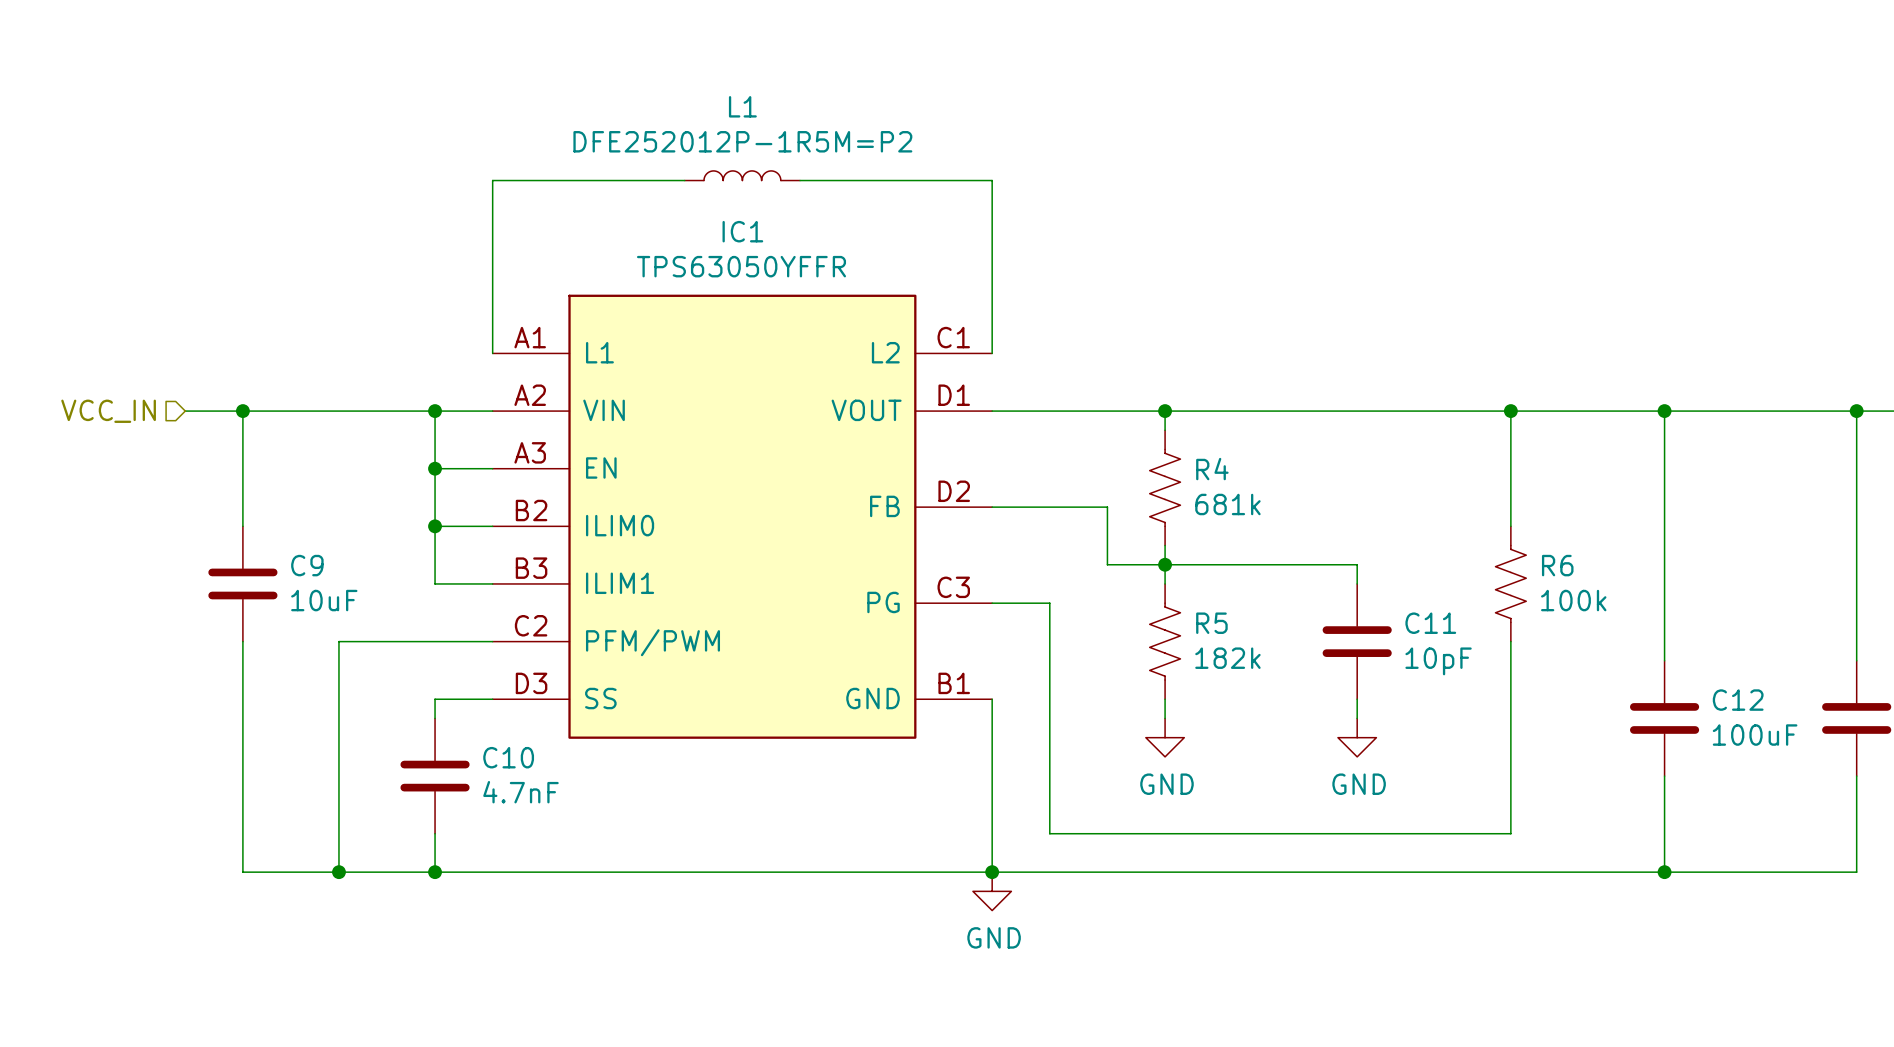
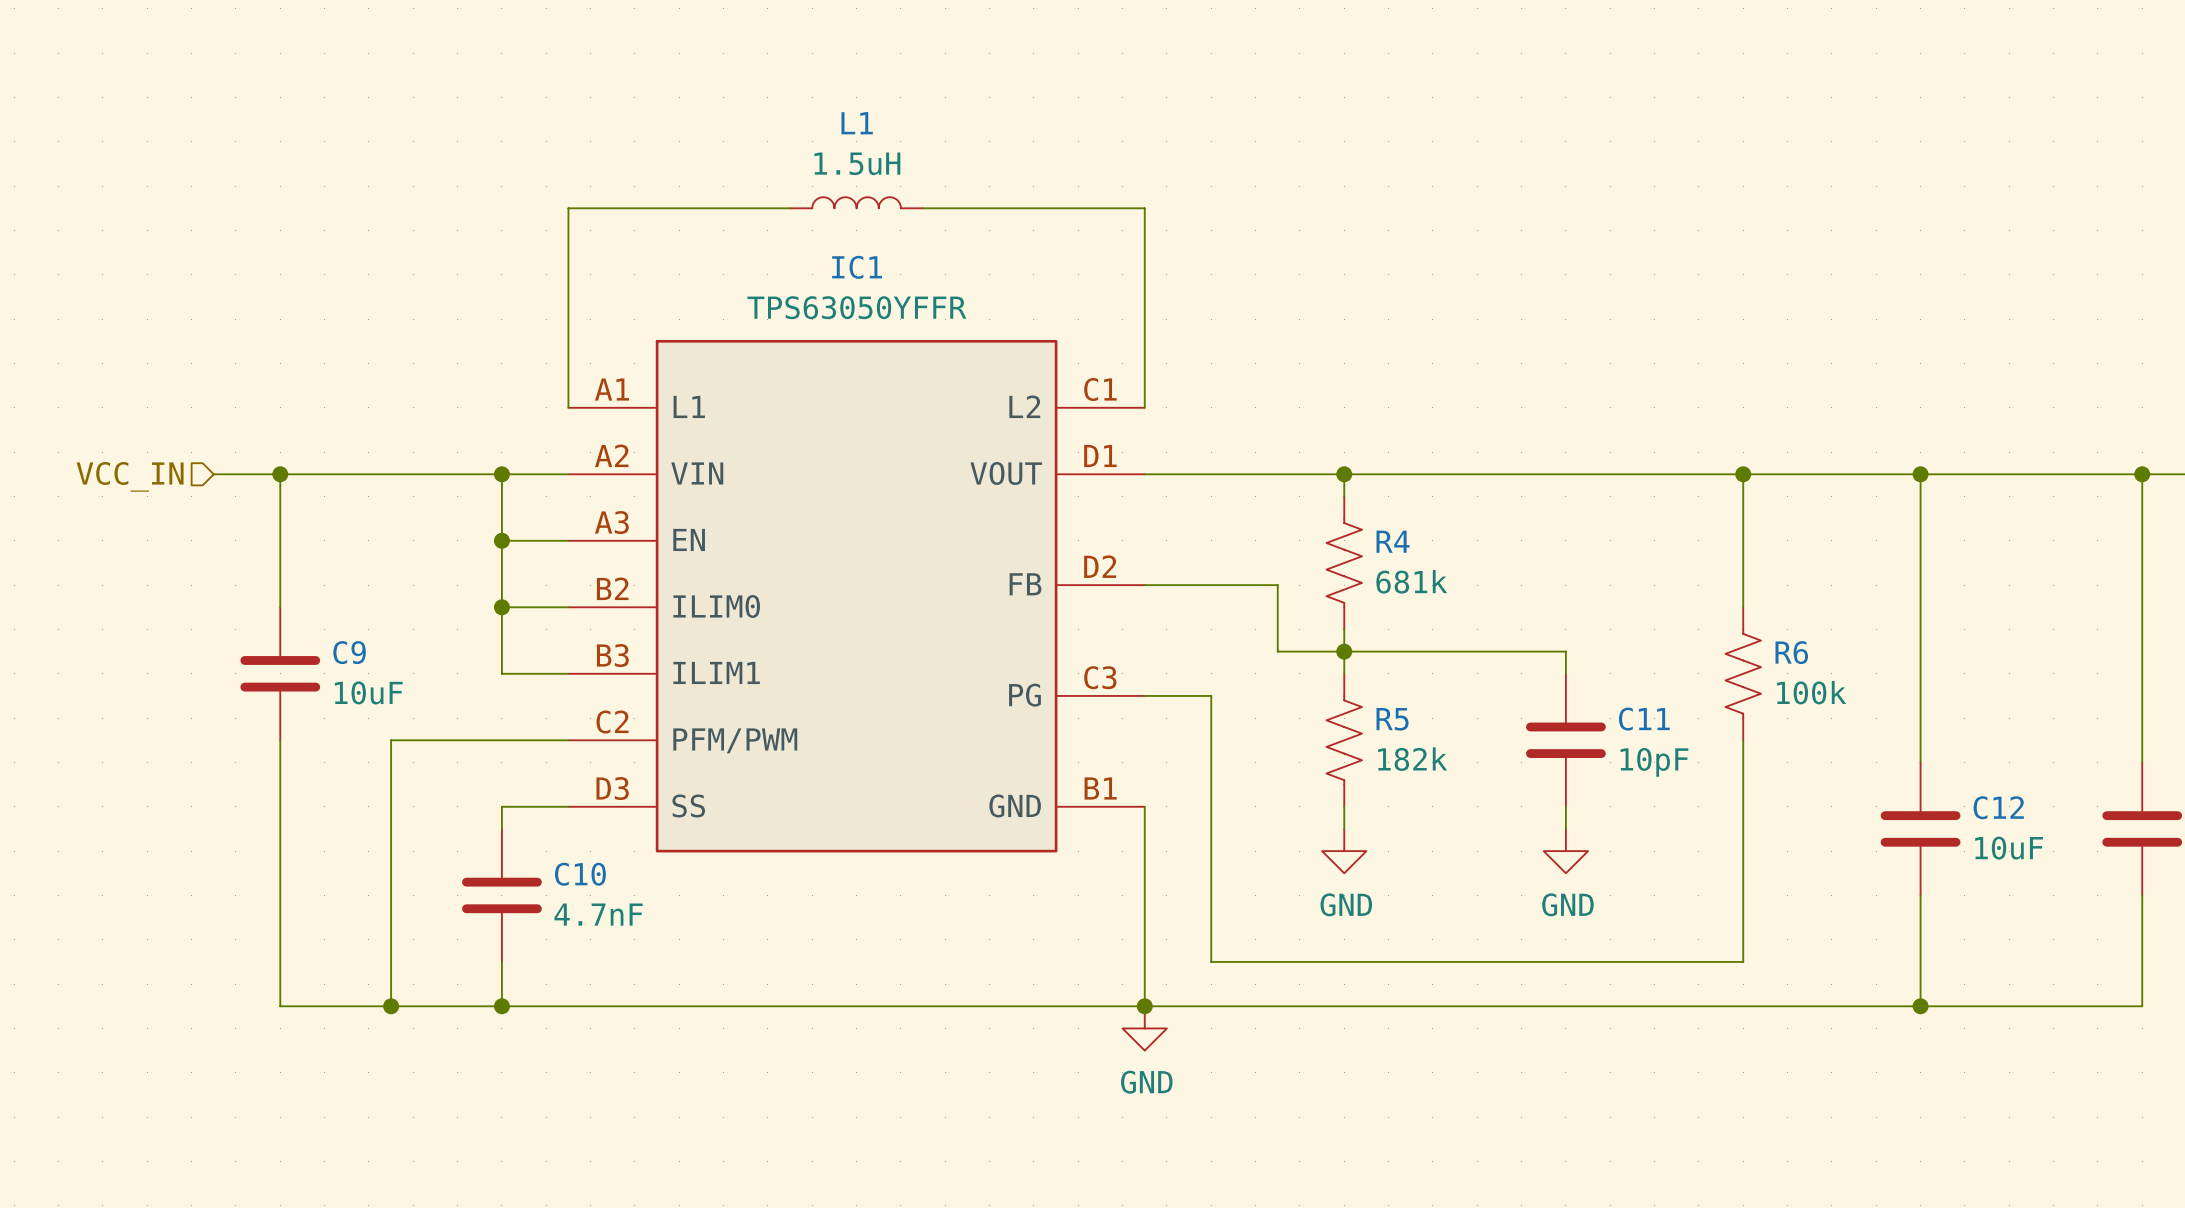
L1 value: DFE252012P-1R5M=P2 (742, 141) -> 1.5uH (857, 163)
C12 value: 100uF (1755, 735) -> 10uF (2009, 848)

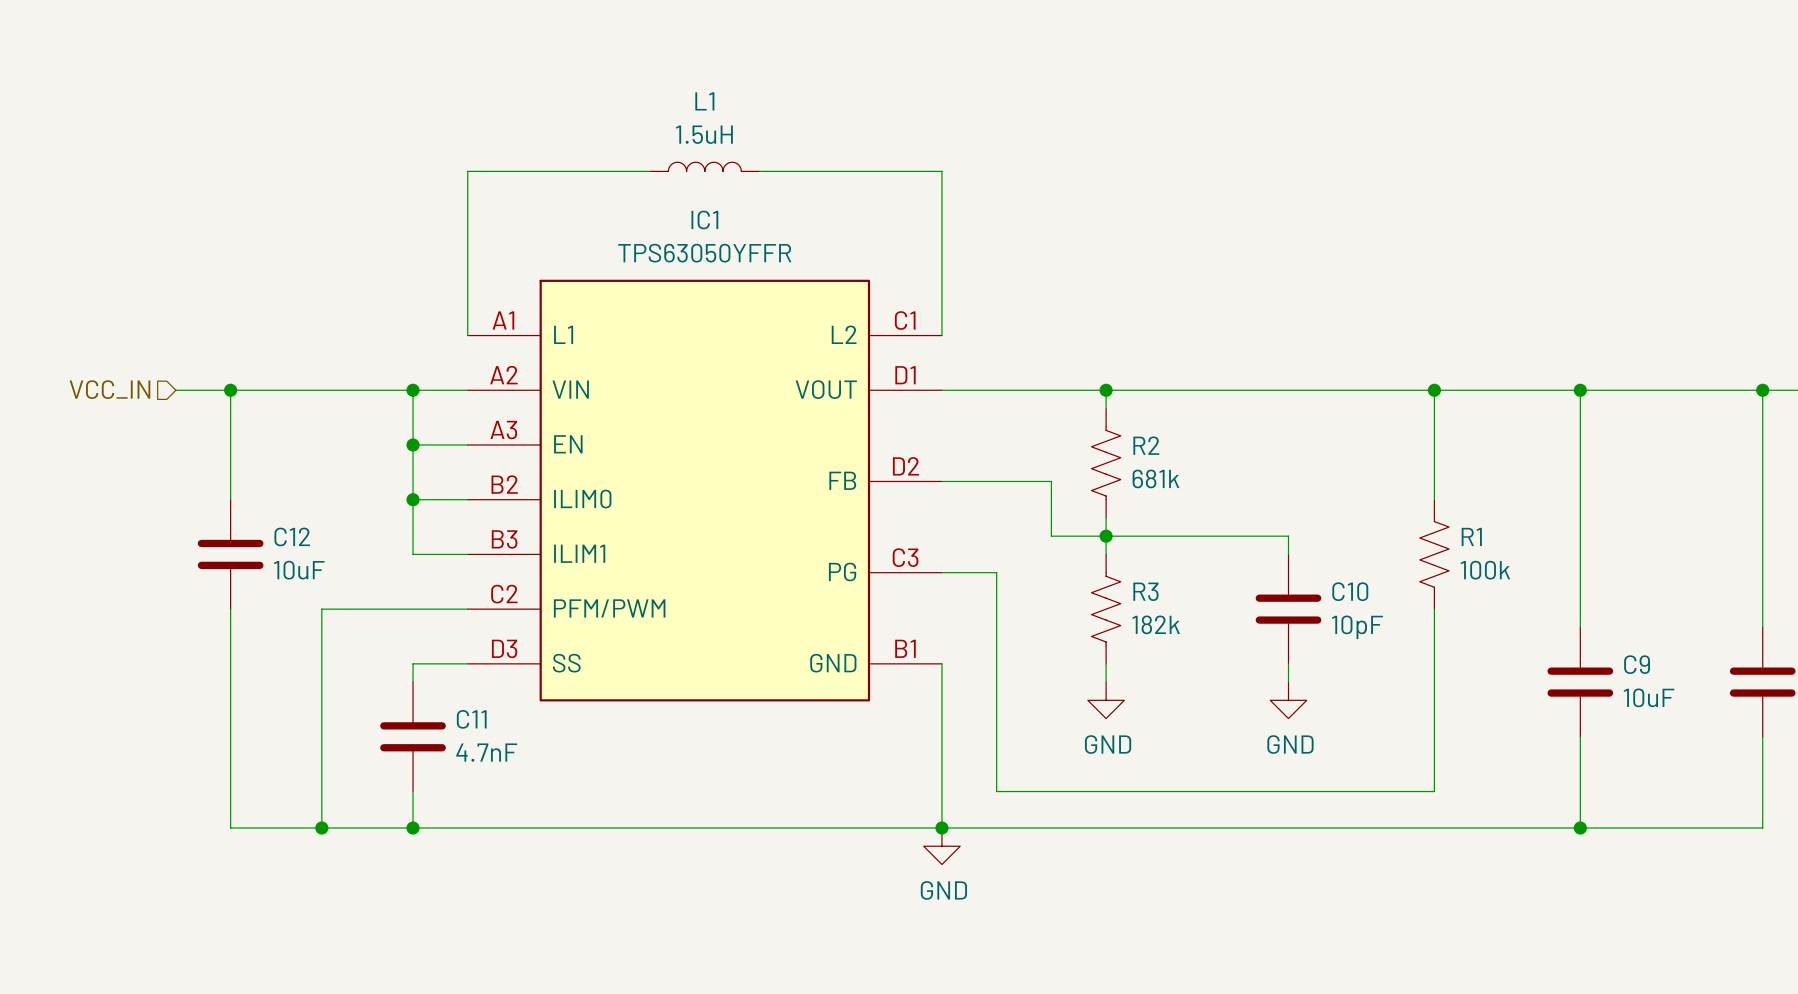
R4 name: R4 (1393, 541) -> R2 (1146, 445)
C9 name: C9 (349, 652) -> C12 (292, 536)
R6 name: R6 (1791, 652) -> R1 (1471, 536)
R5 name: R5 (1392, 719) -> R3 (1145, 591)
C11 name: C11 (1644, 719) -> C10 (1350, 591)
C12 name: C12 (1998, 807) -> C9 (1637, 664)
C10 name: C10 (580, 874) -> C11 (471, 719)

